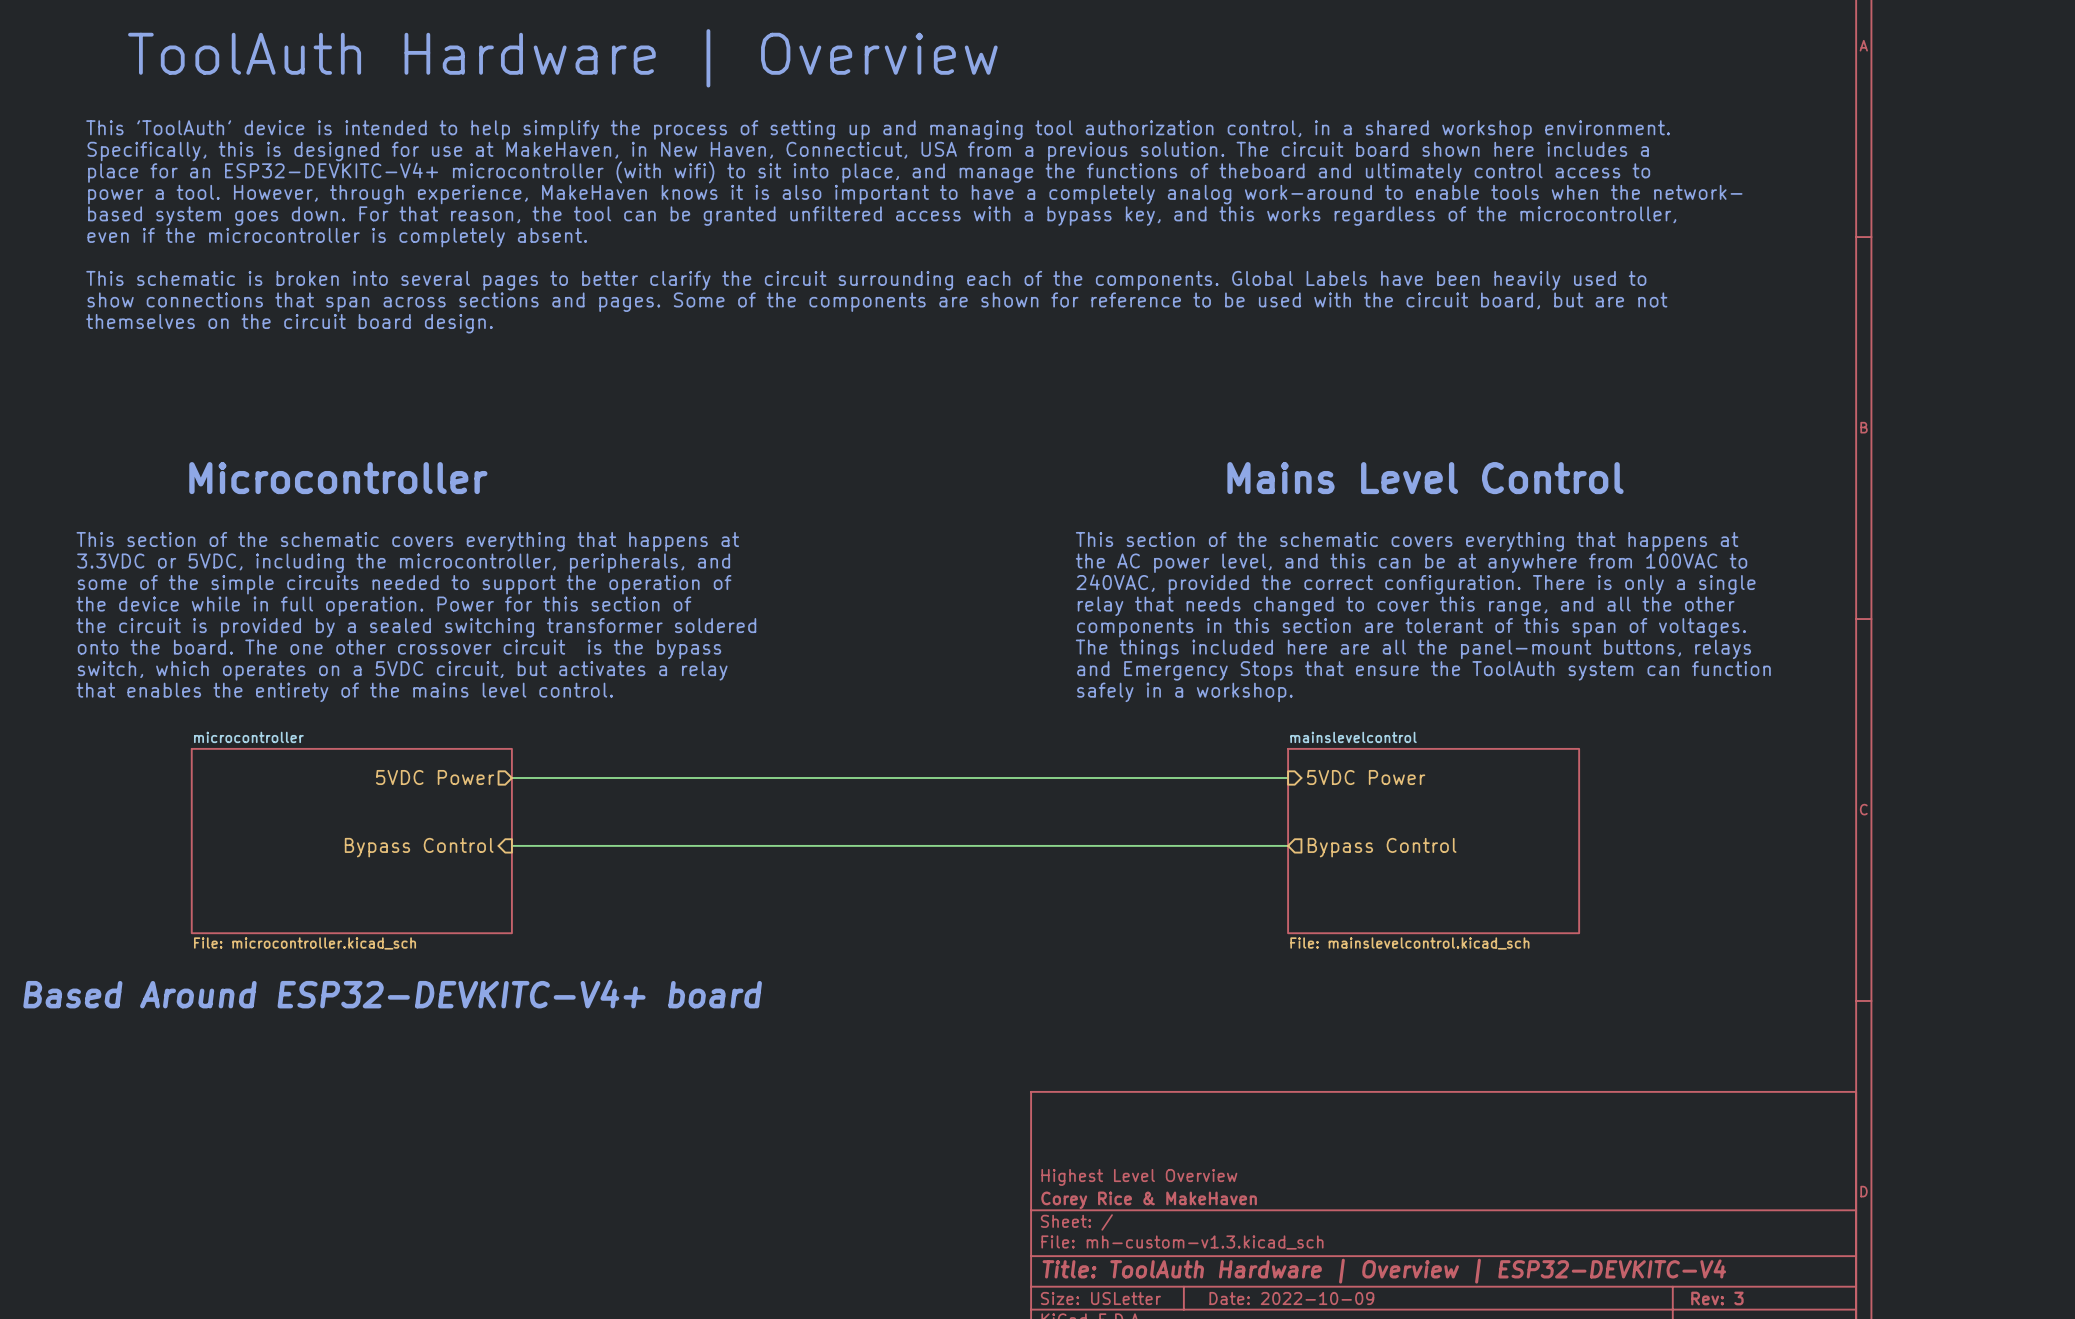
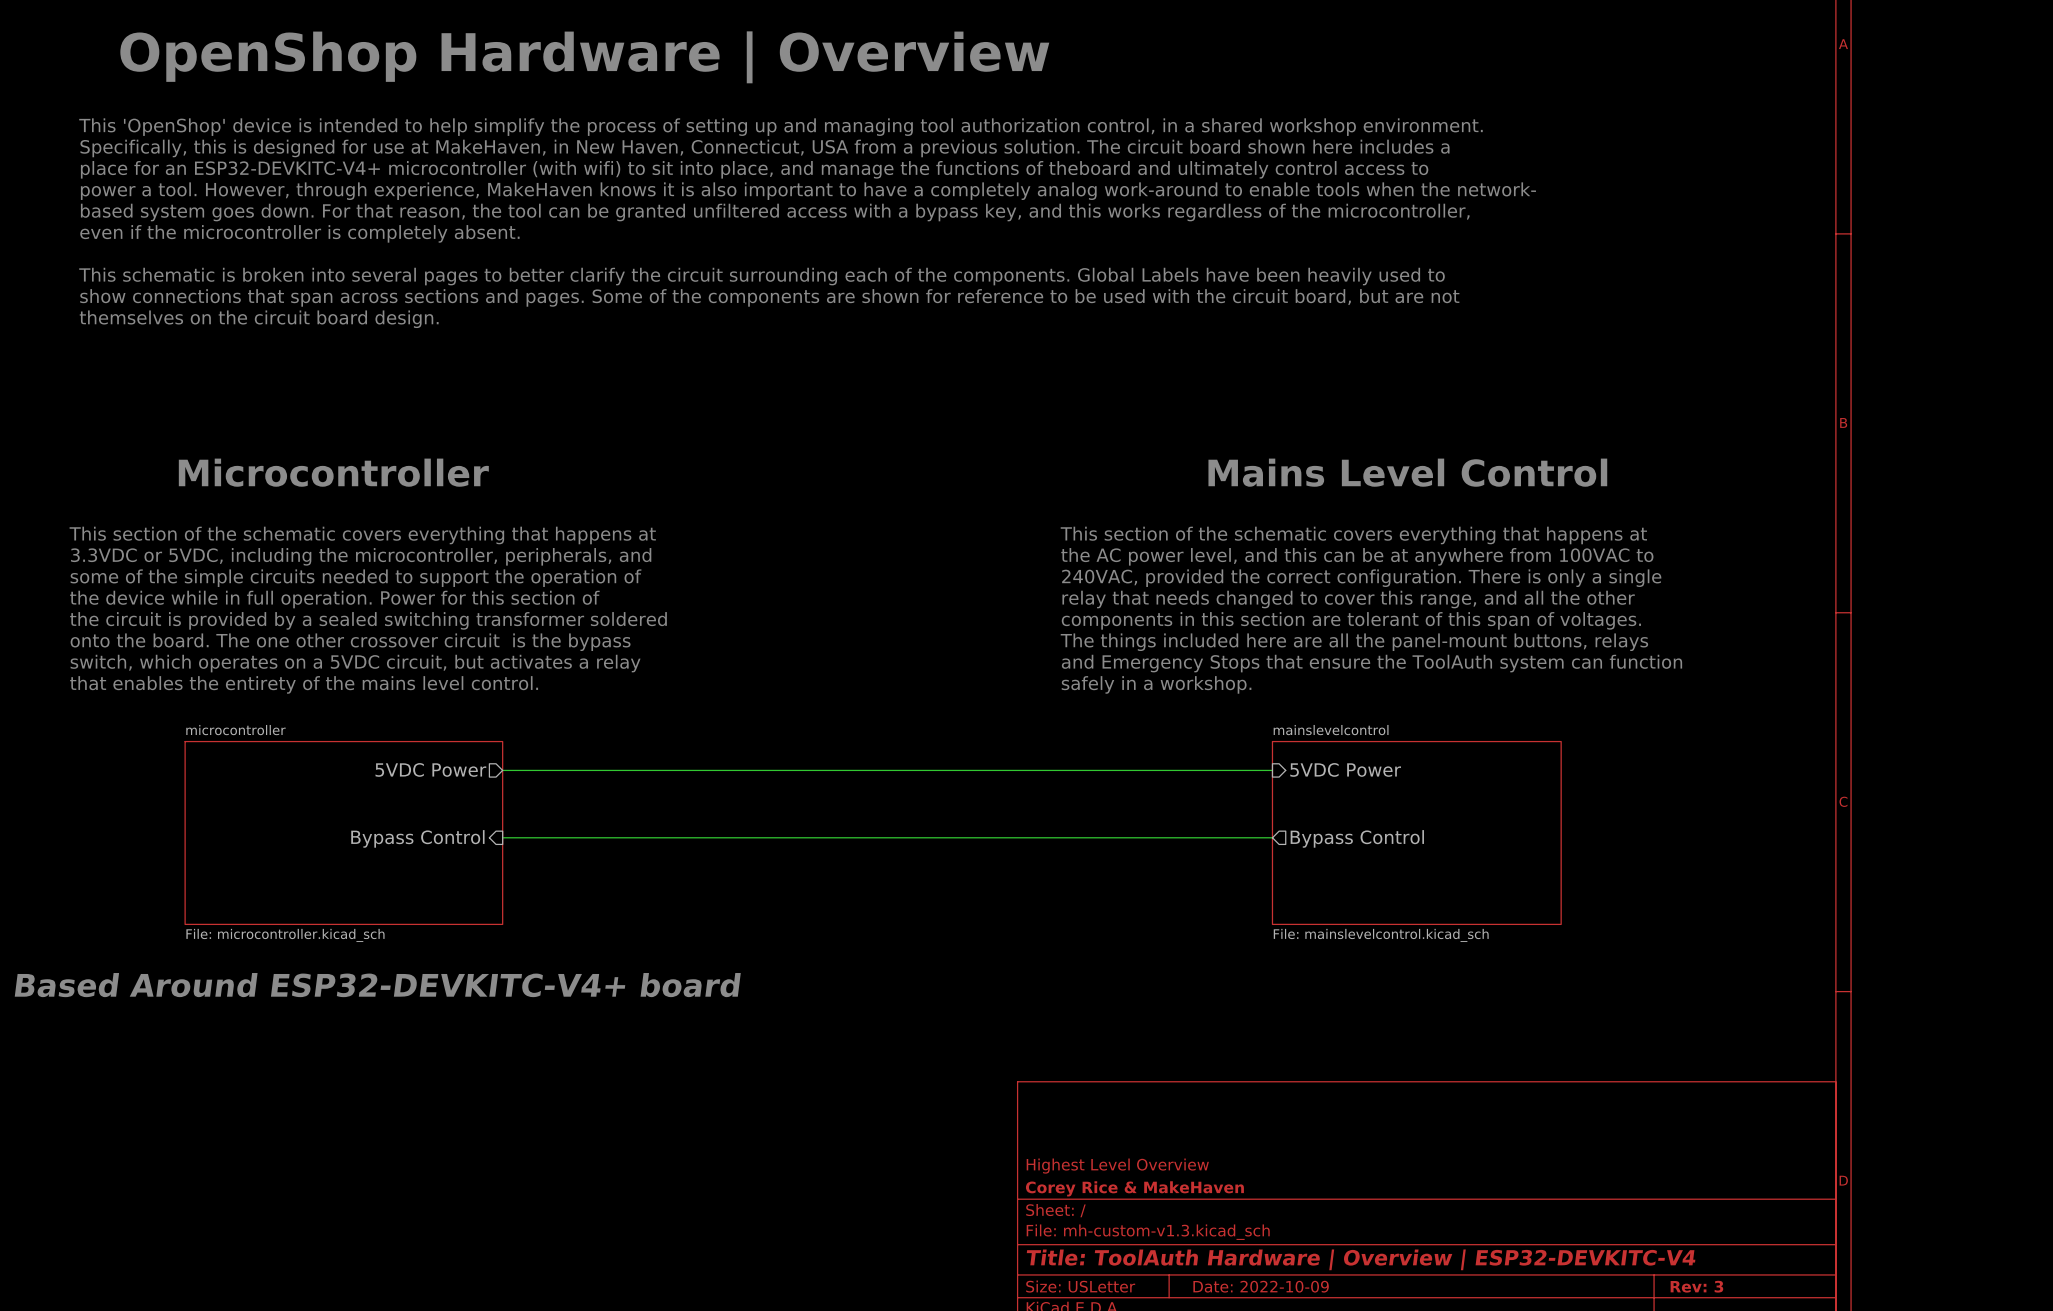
text: ToolAuth Hardware | Overview (562, 58) -> OpenShop Hardware | Overview (584, 57)
text: This 'ToolAuth' device is intended to help simplify the process of setting up and managing tool authorization control, in a shared workshop environment. (878, 129) -> This 'OpenShop' device is intended to help simplify the process of setting up and managing tool authorization control, in a shared workshop environment. (780, 127)

